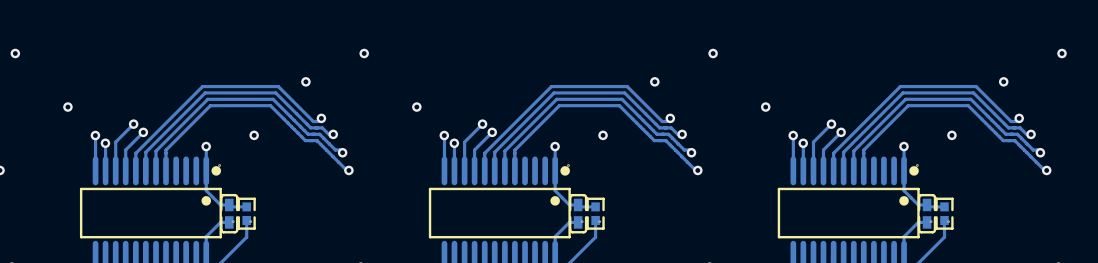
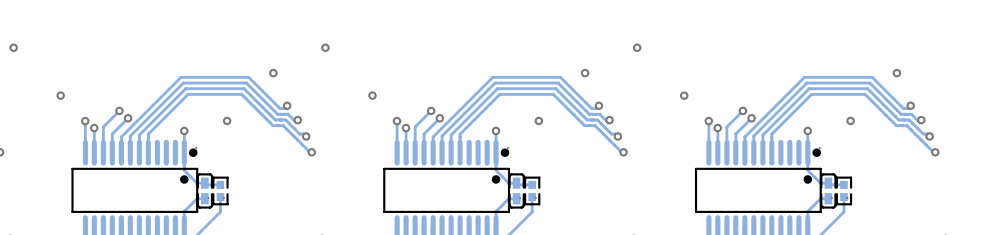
via: (1061, 53) -> none

